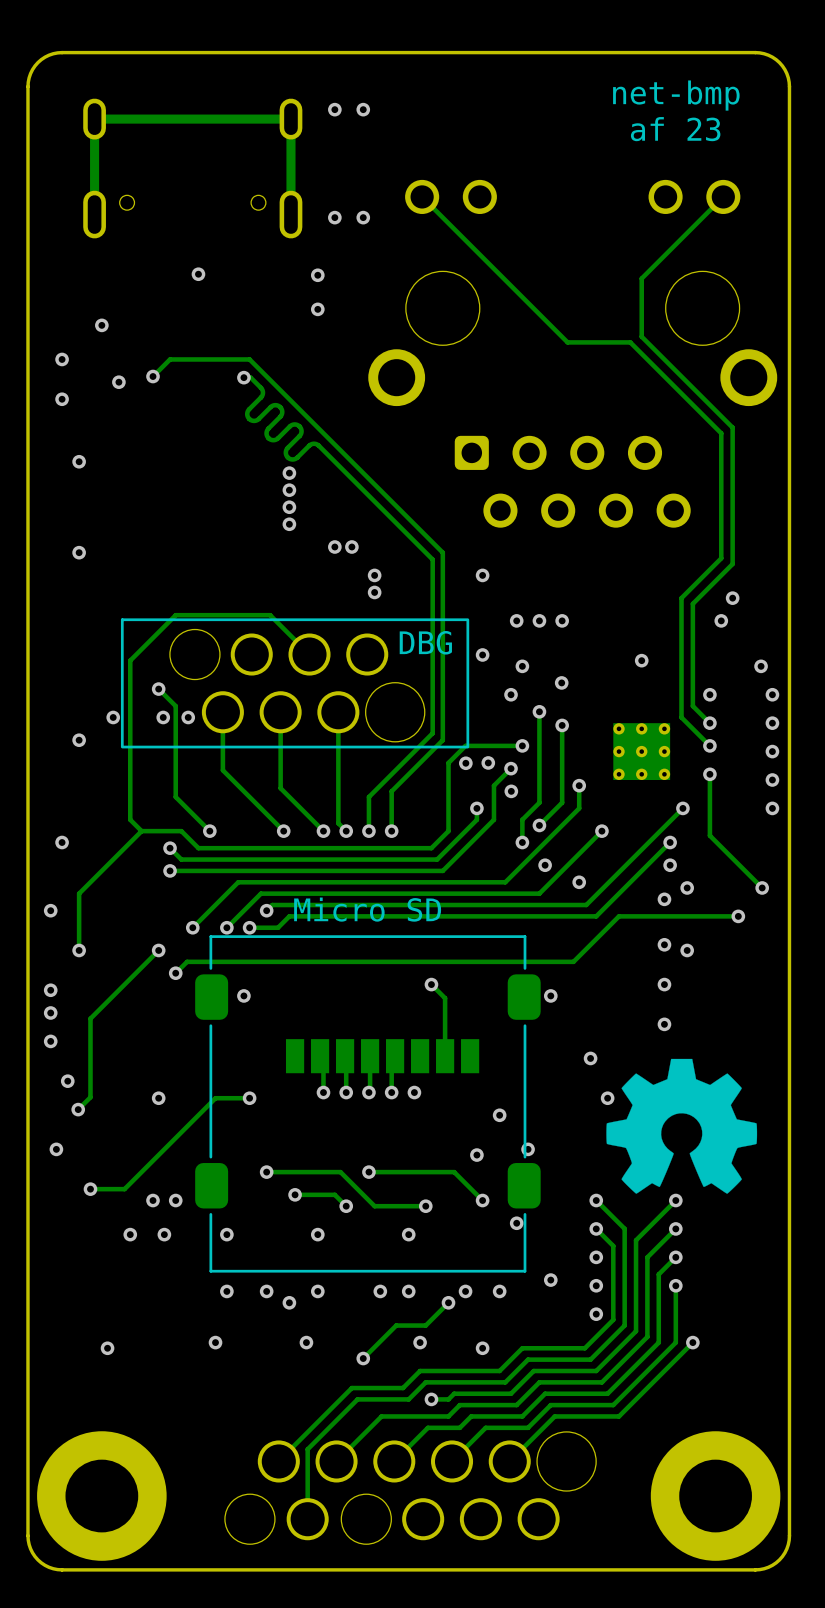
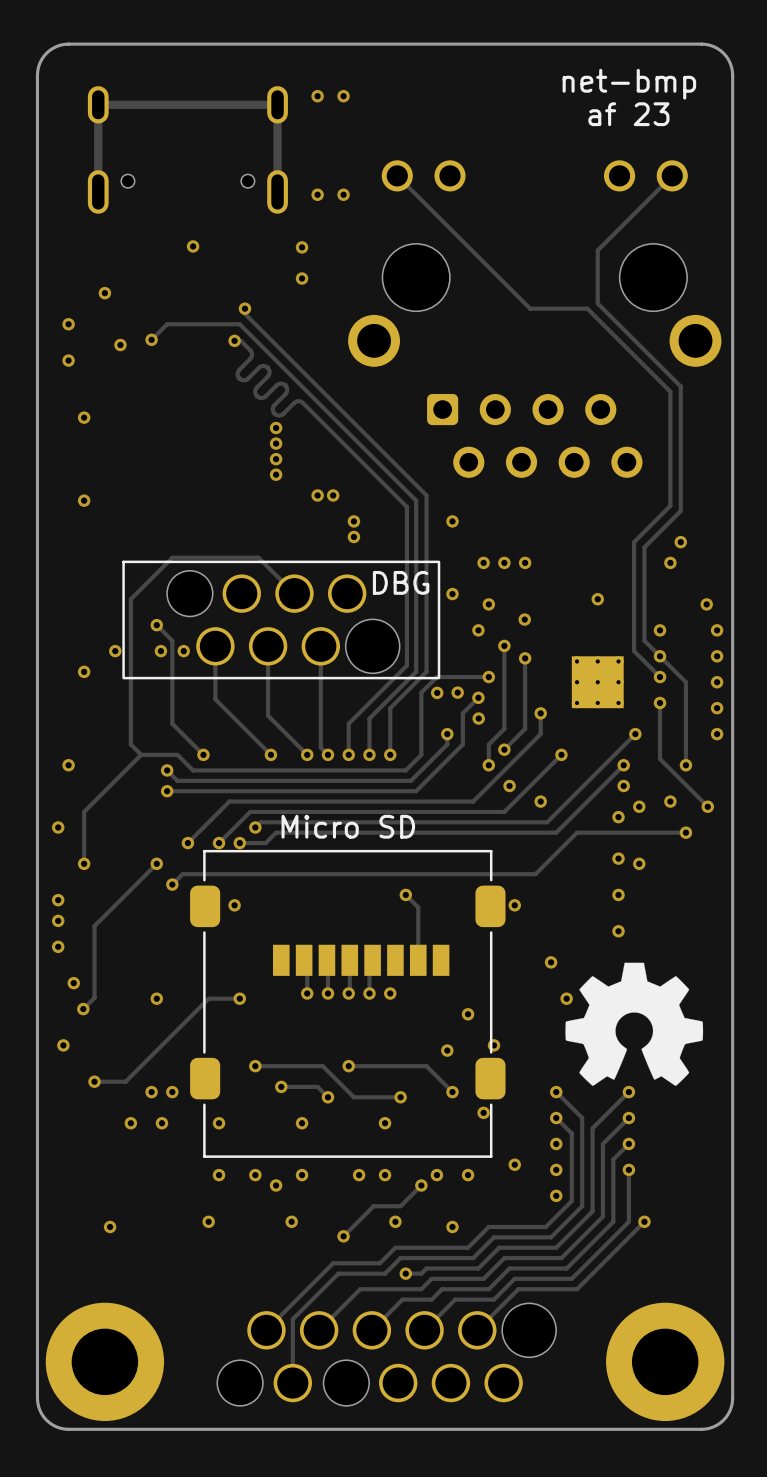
track: none -> (244, 308) (244, 313) (426, 495) (426, 671) (390, 708) (390, 754)
via: none -> (244, 308)
track: none -> (660, 656) (685, 682) (685, 765)
via: none -> (390, 754)
via: none -> (685, 765)
via: none -> (670, 801)

